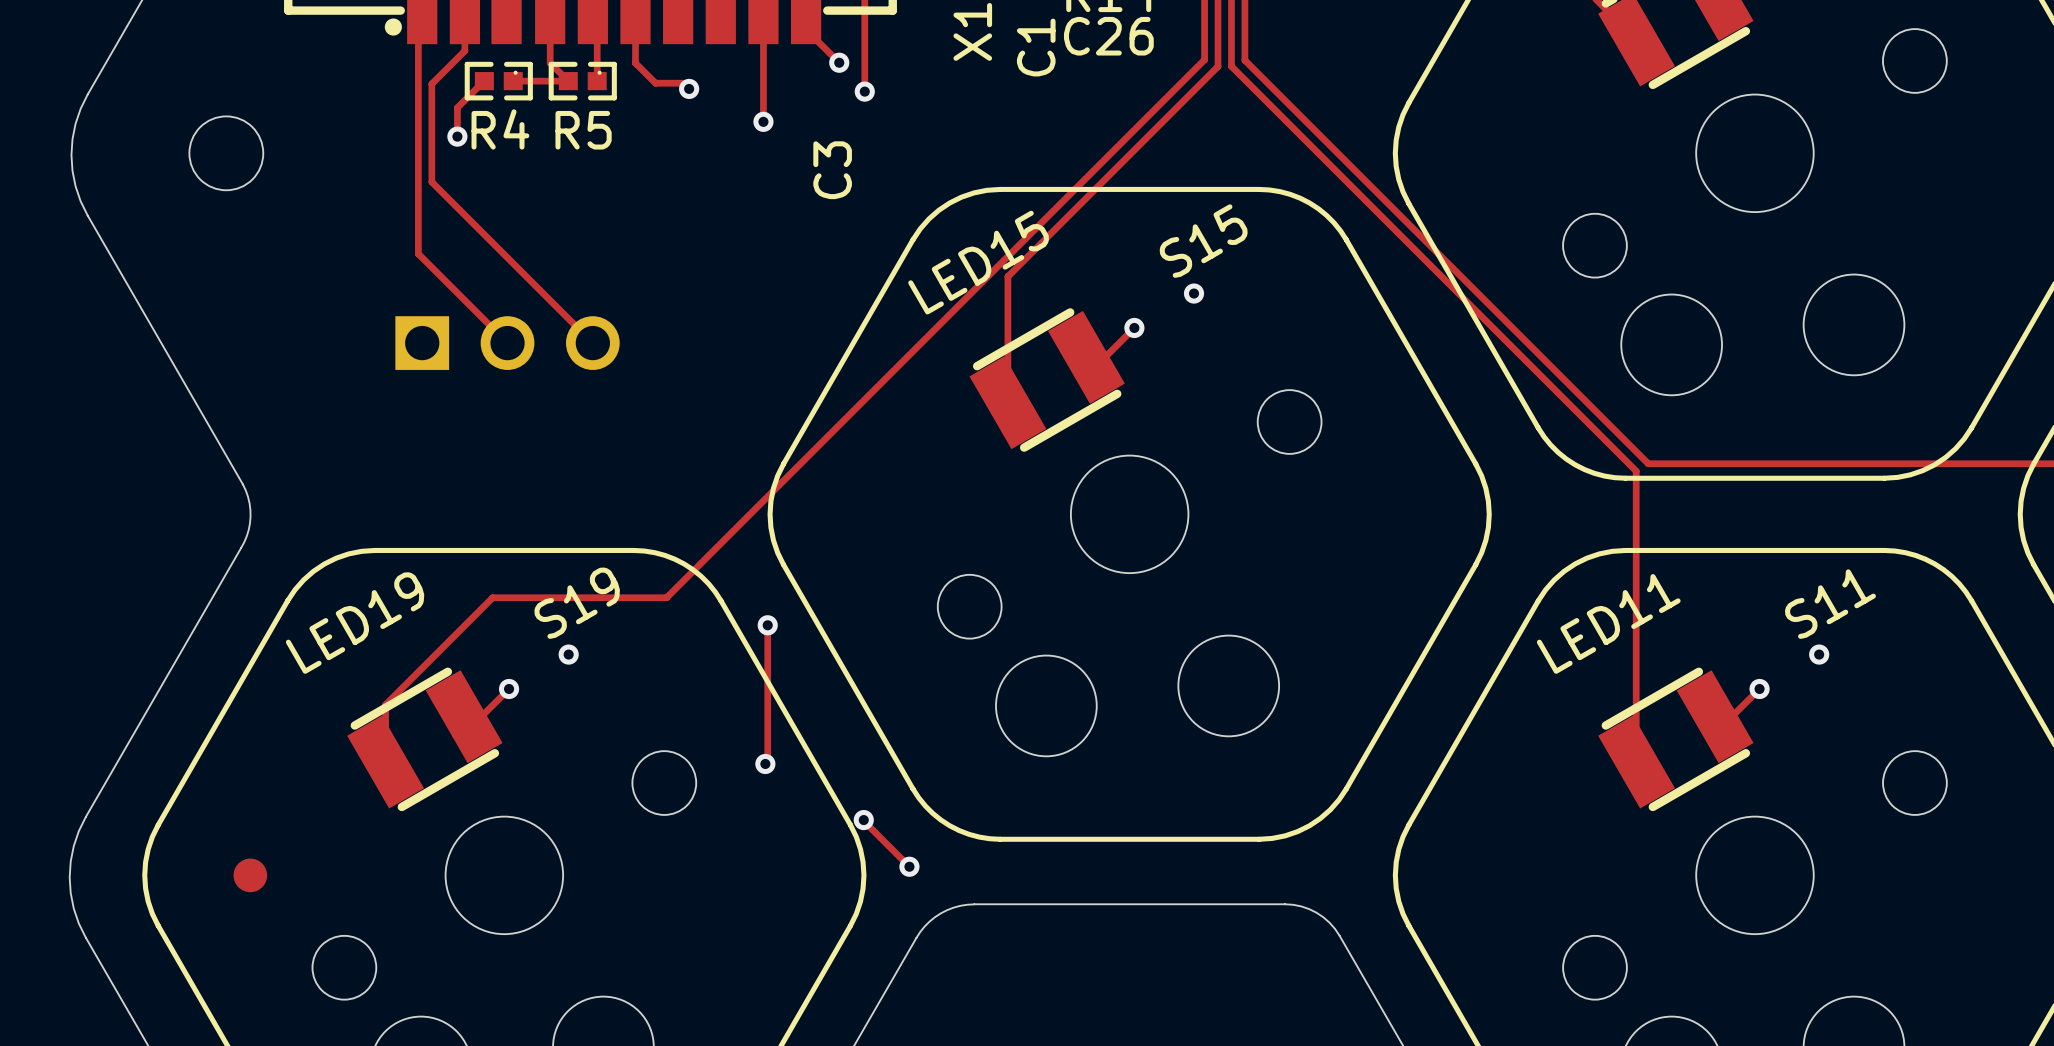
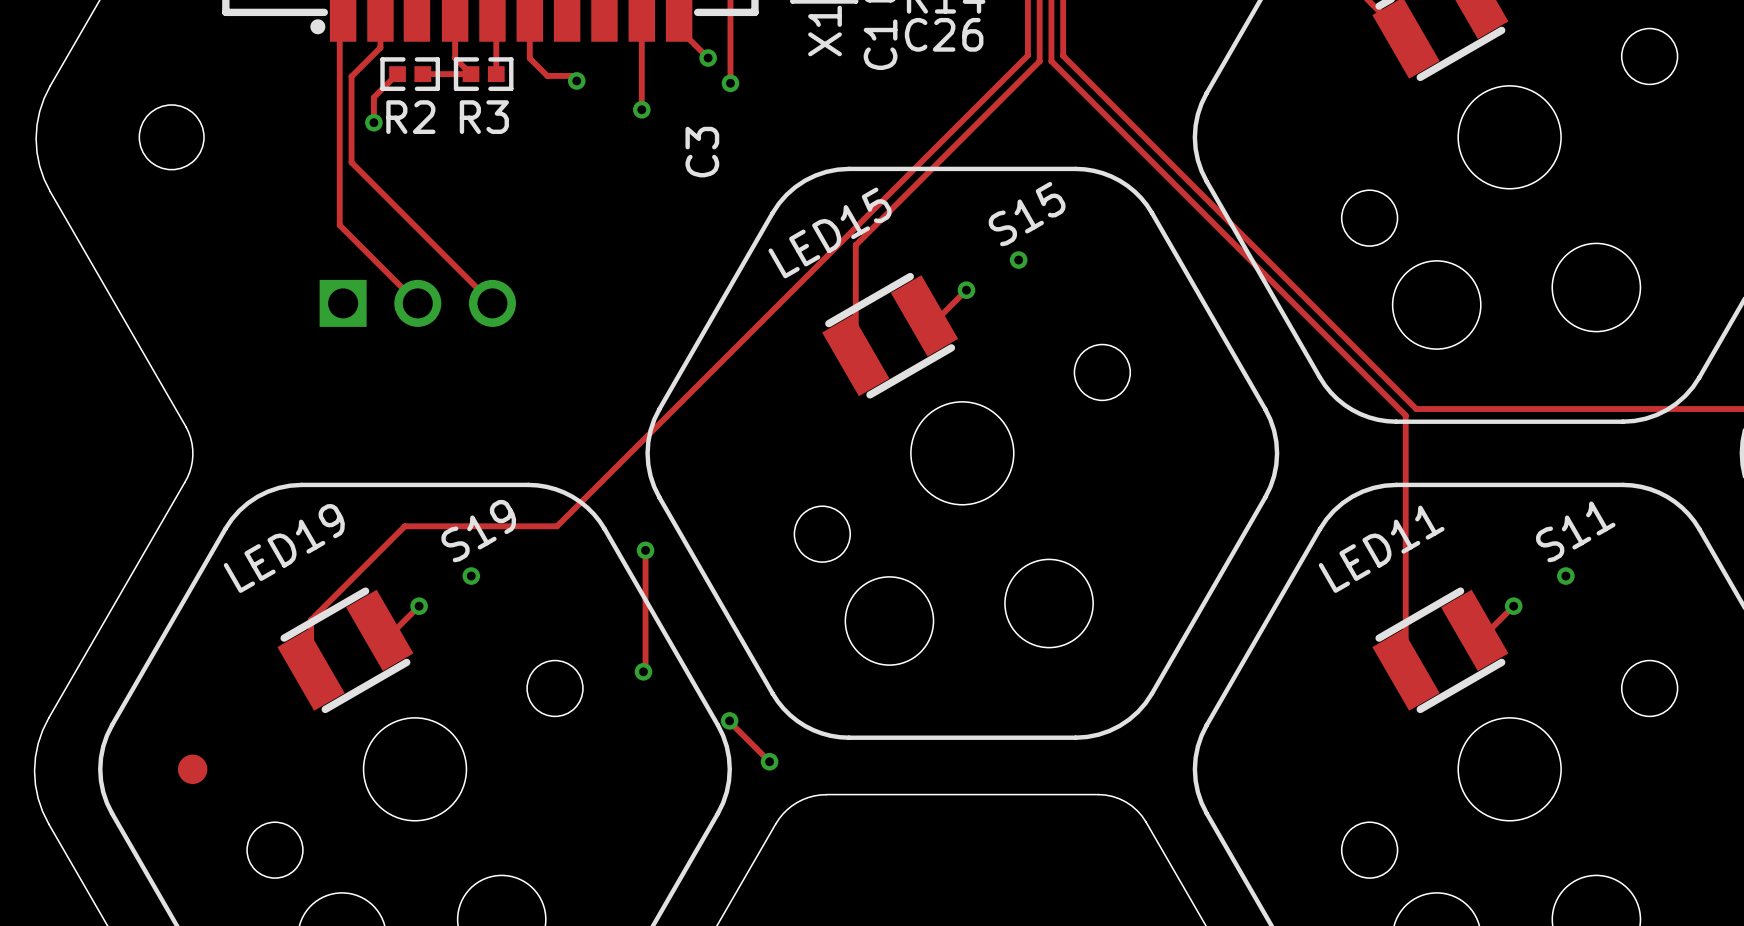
R4: (498, 81) -> none
R2: none -> (410, 74)
R5: (582, 81) -> none
R3: none -> (483, 74)

